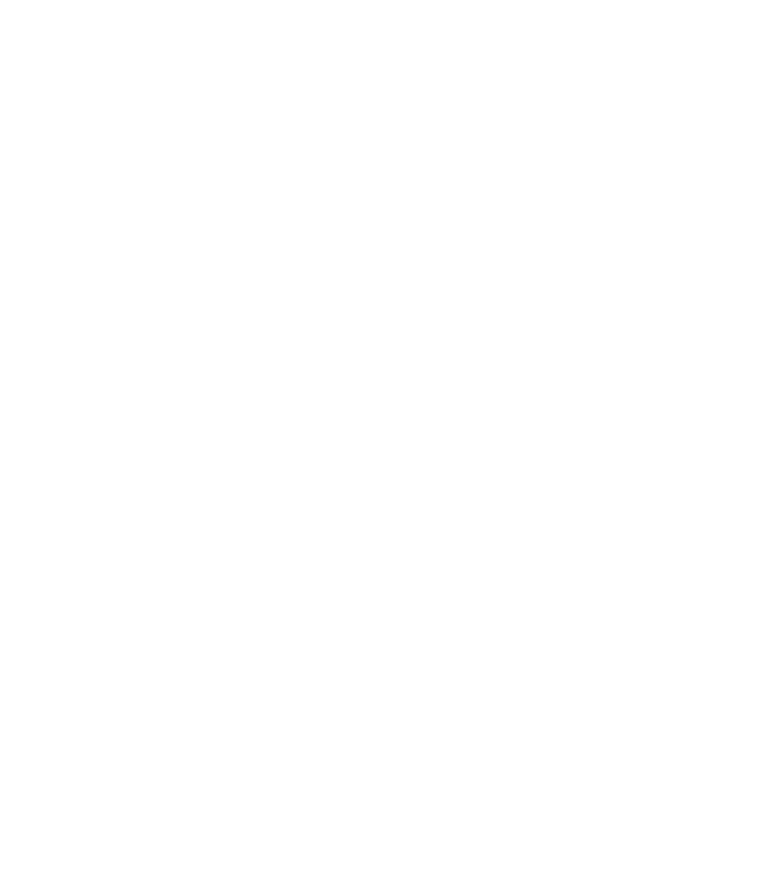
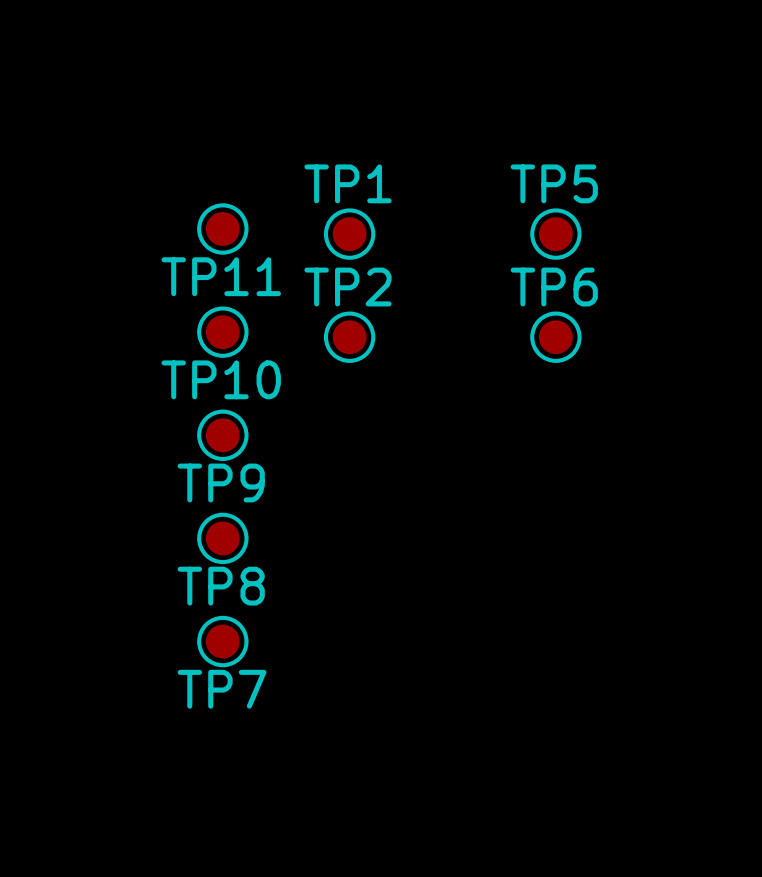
TP11: none -> (222, 229)
TP1: none -> (349, 234)
TP5: none -> (555, 234)
TP10: none -> (222, 332)
TP2: none -> (349, 337)
TP6: none -> (555, 337)
TP9: none -> (222, 435)
TP8: none -> (222, 538)
TP7: none -> (222, 641)

